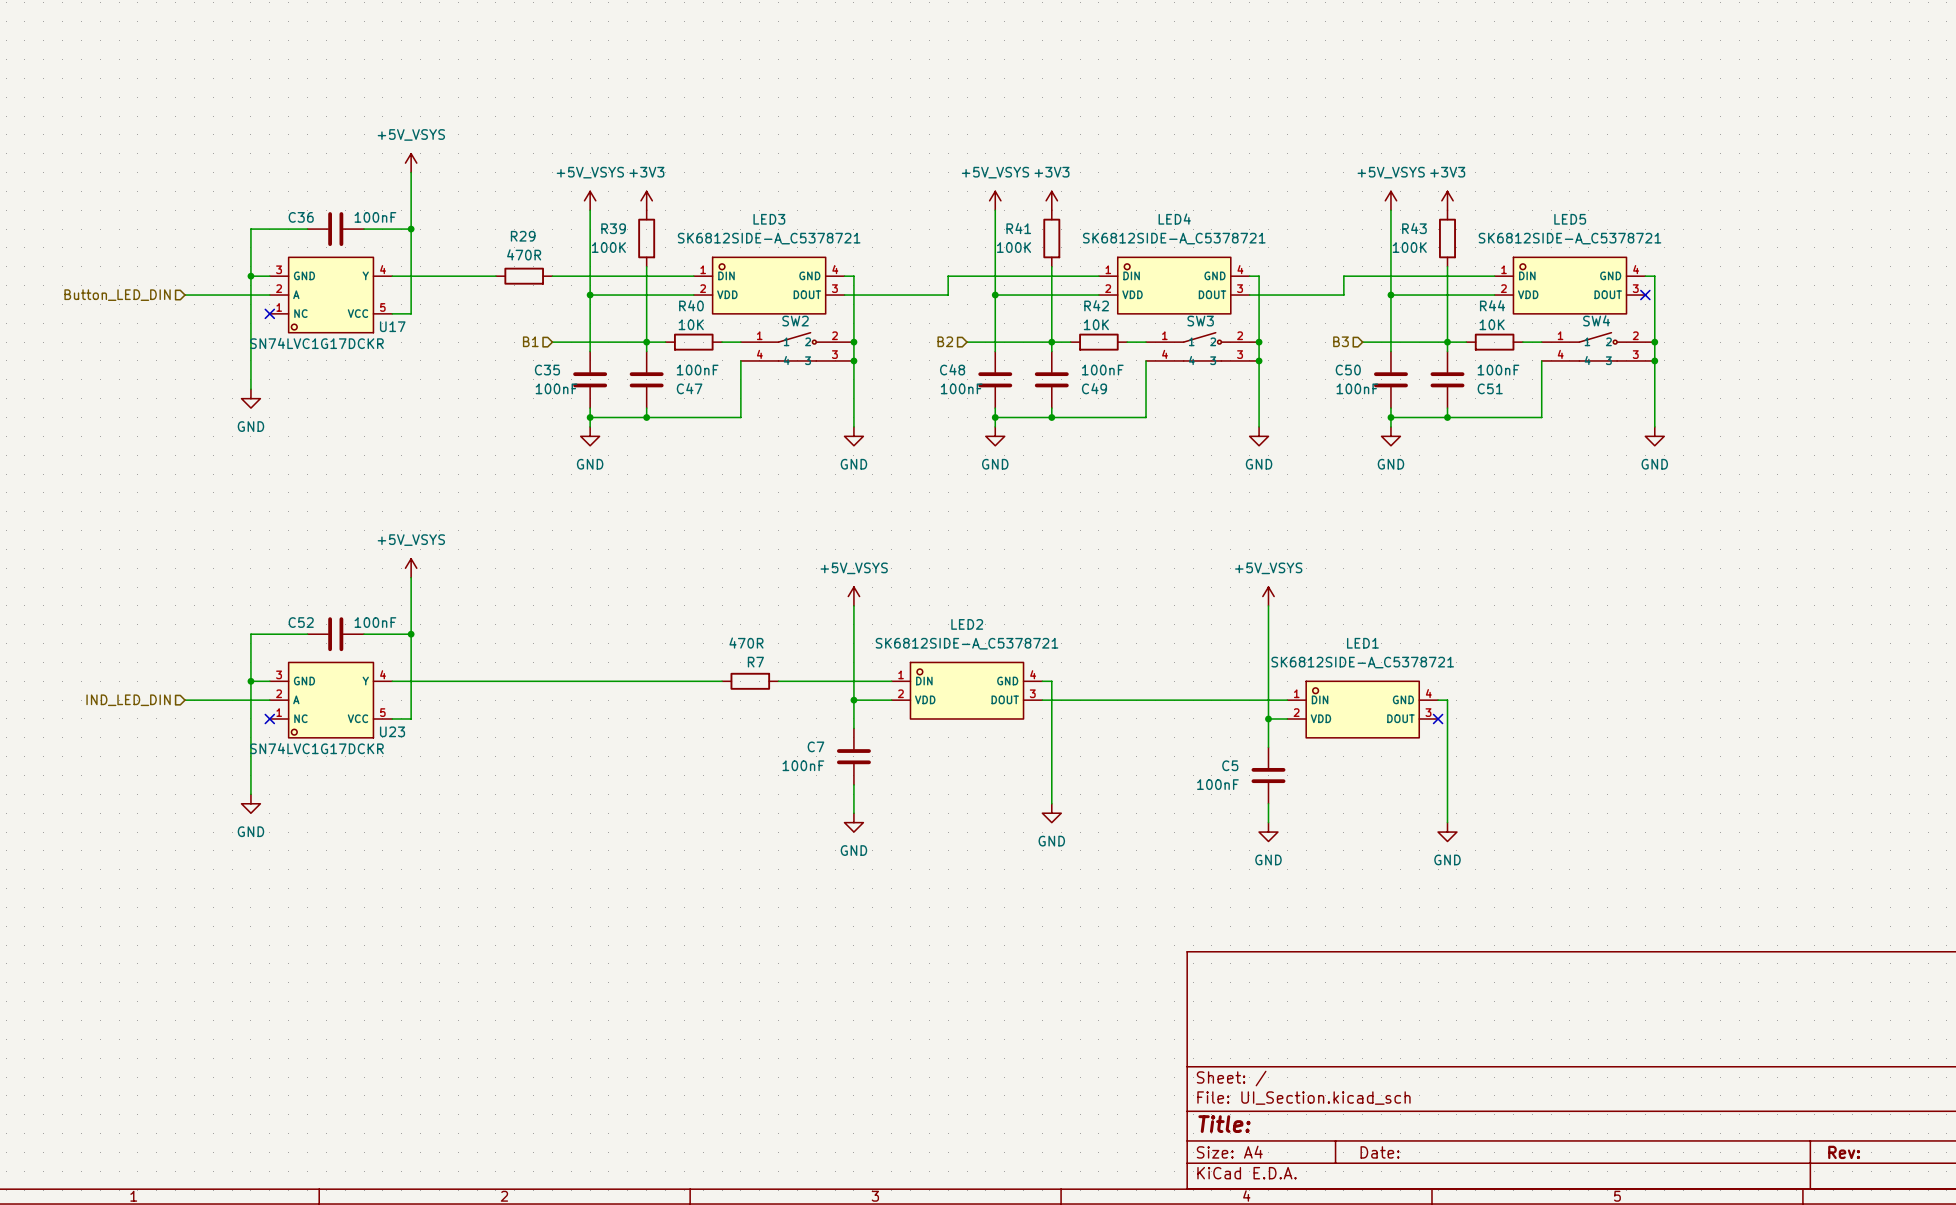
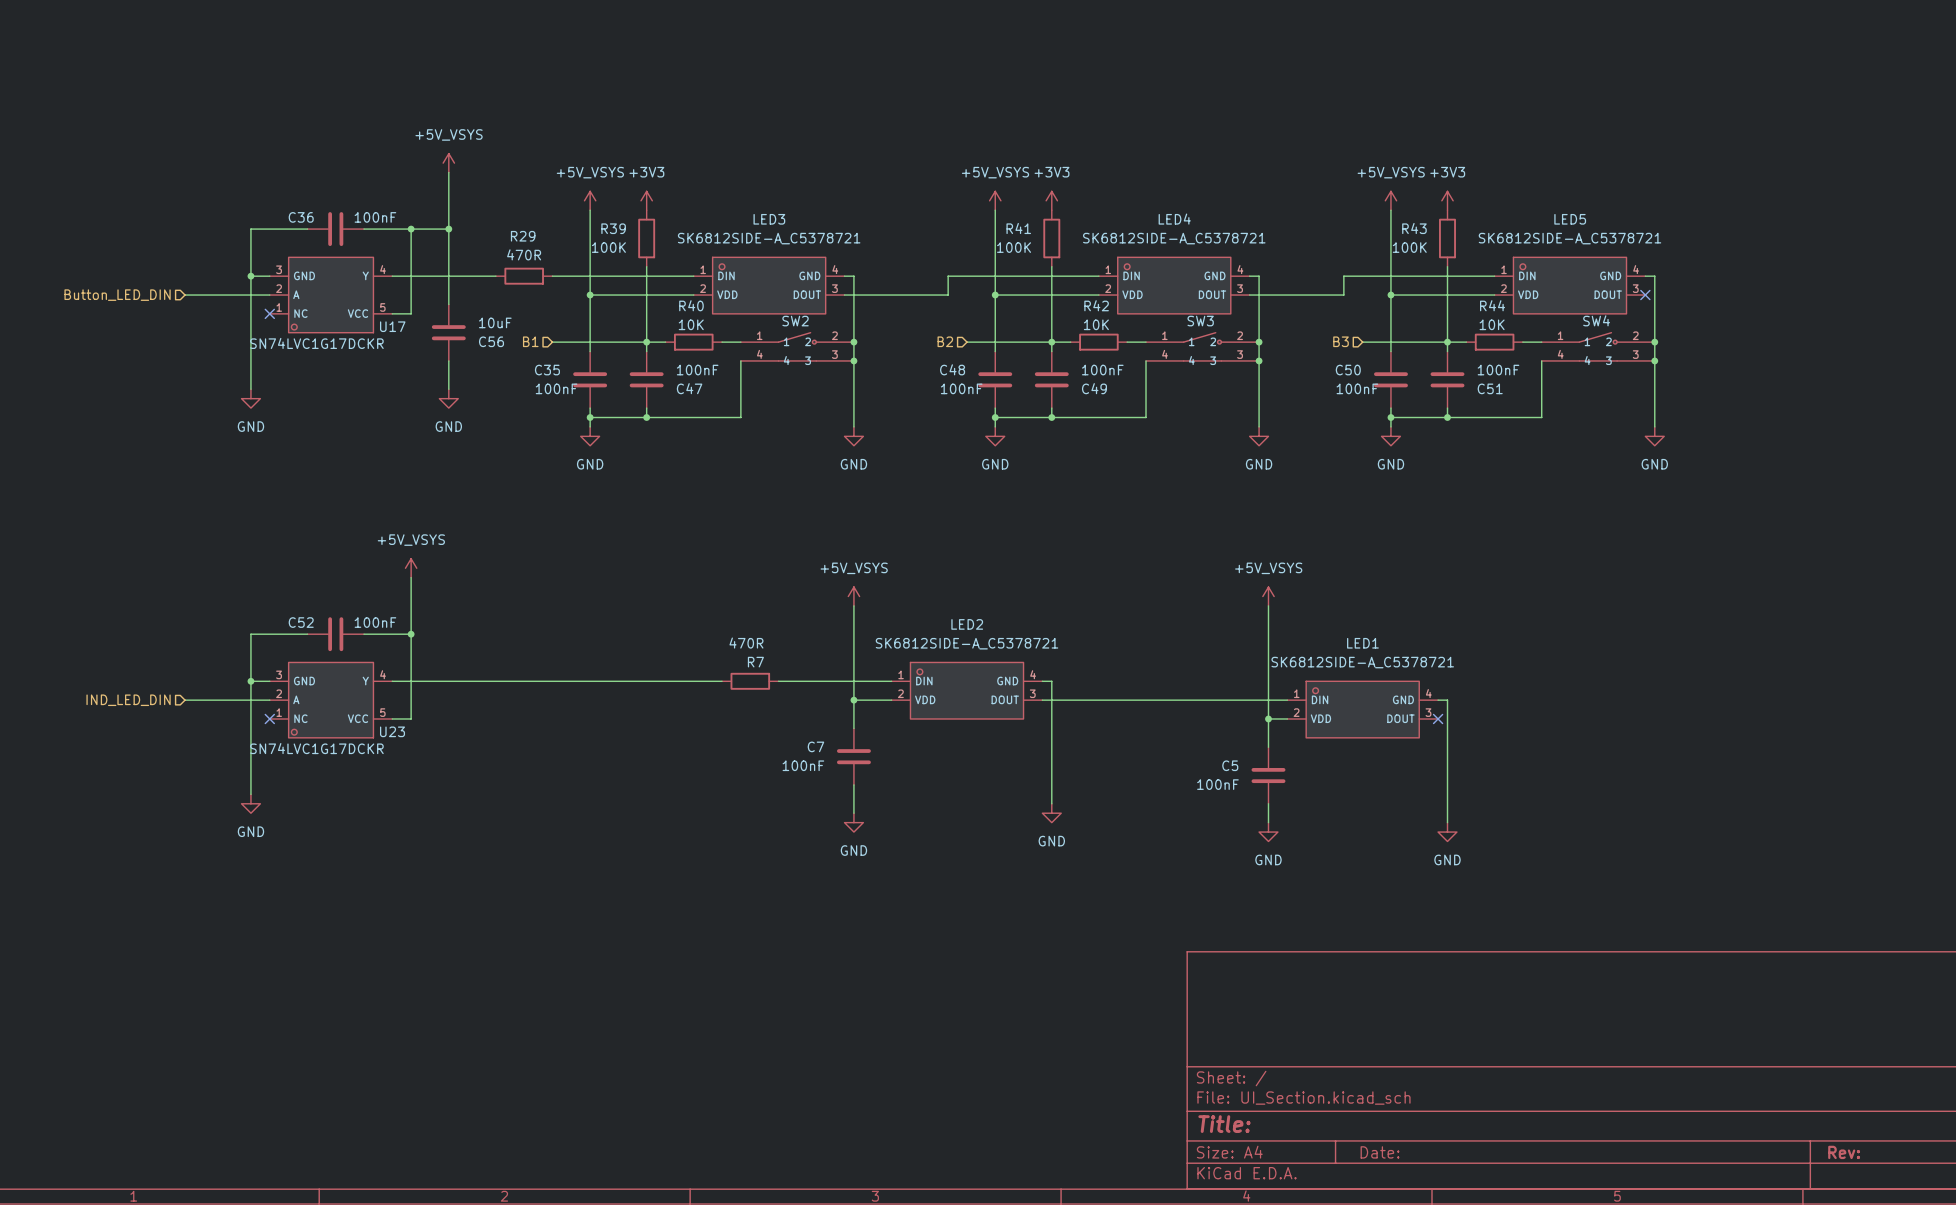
power symbol position: +5V_VSYS (411, 163) -> +5V_VSYS (448, 163)
wire: (411, 172) (411, 229) -> (448, 229) (411, 229)
wire: none -> (448, 172) (448, 304)
junction: none -> (448, 229)
C56: none -> 10uF (448, 332)
wire: none -> (448, 360) (448, 389)
power symbol: none -> GND (448, 398)

